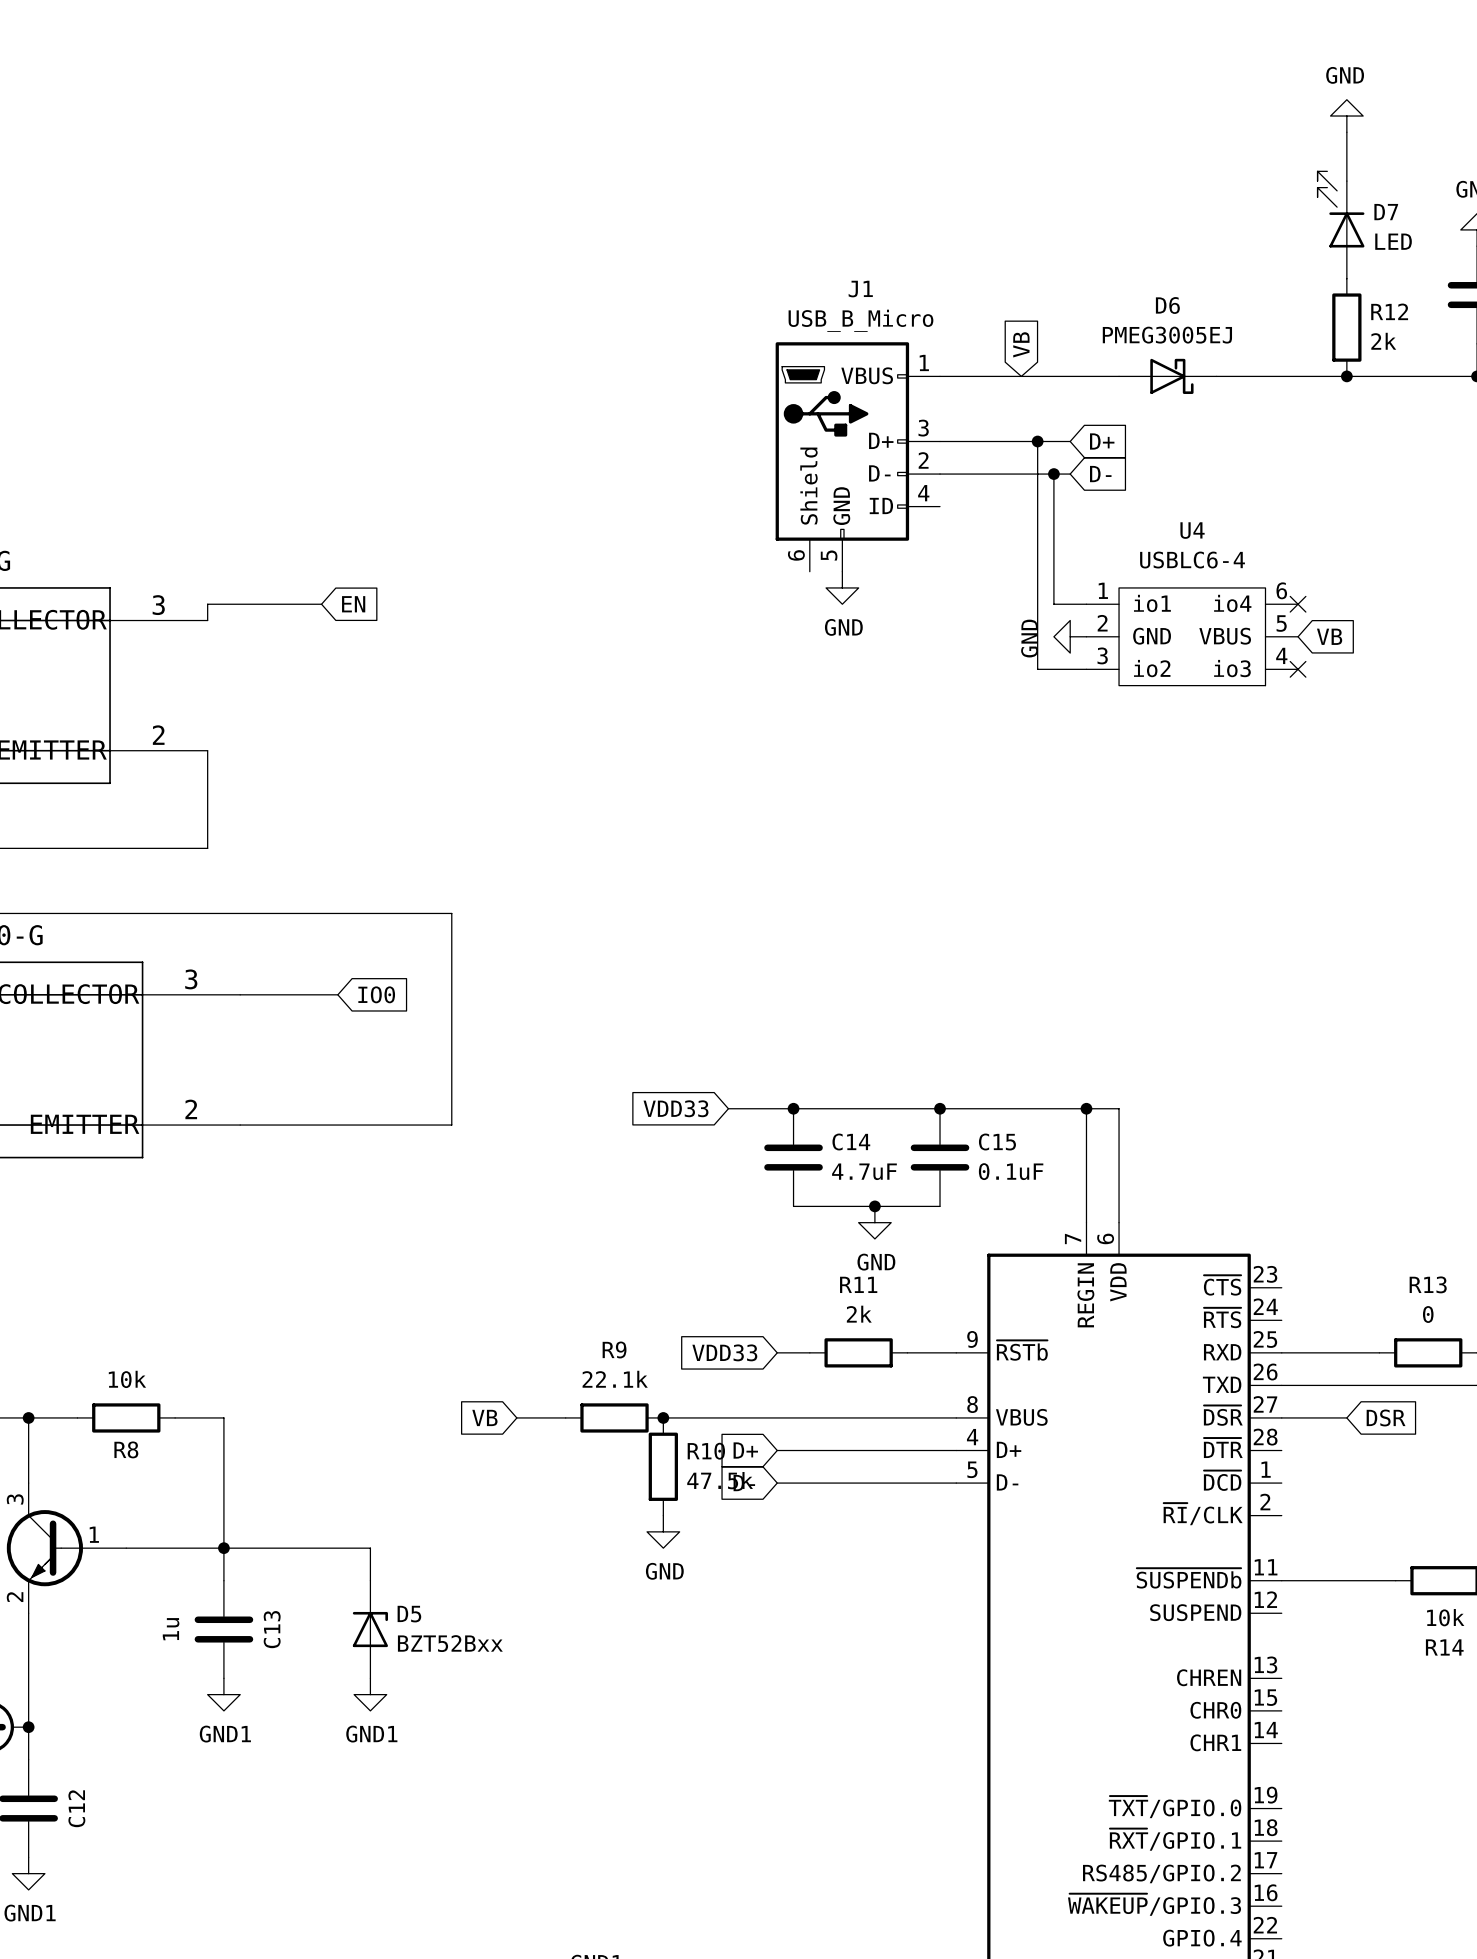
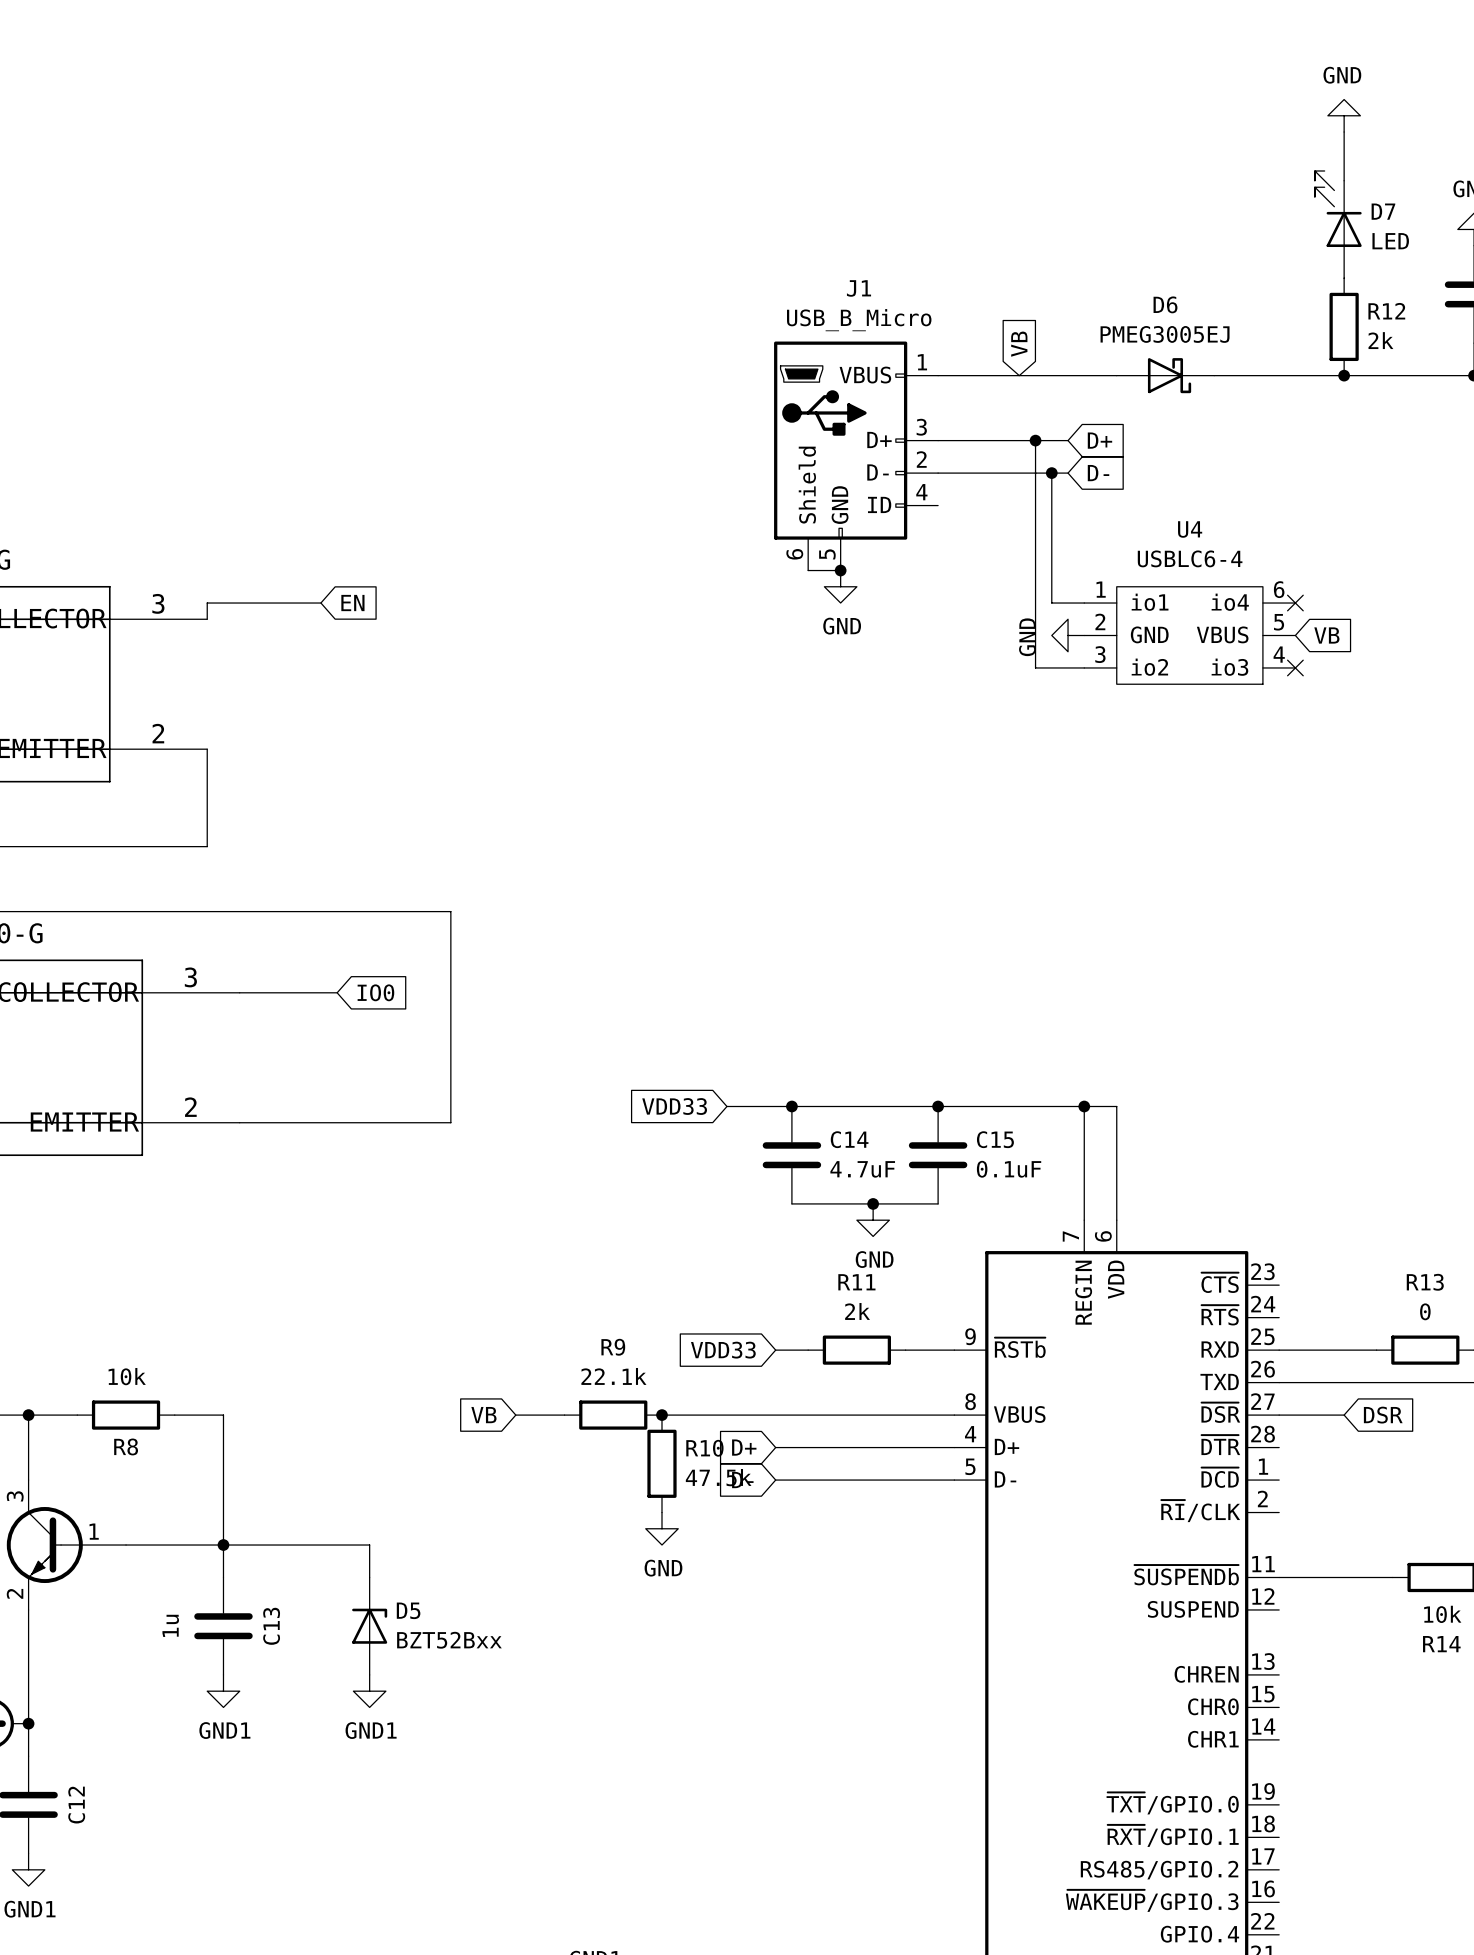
wire: none -> (808, 570) (840, 570)
junction: none -> (840, 570)

